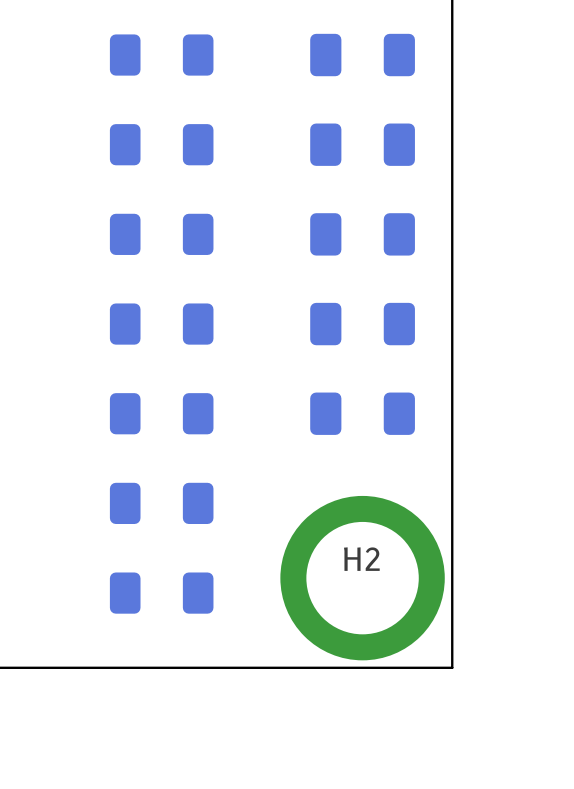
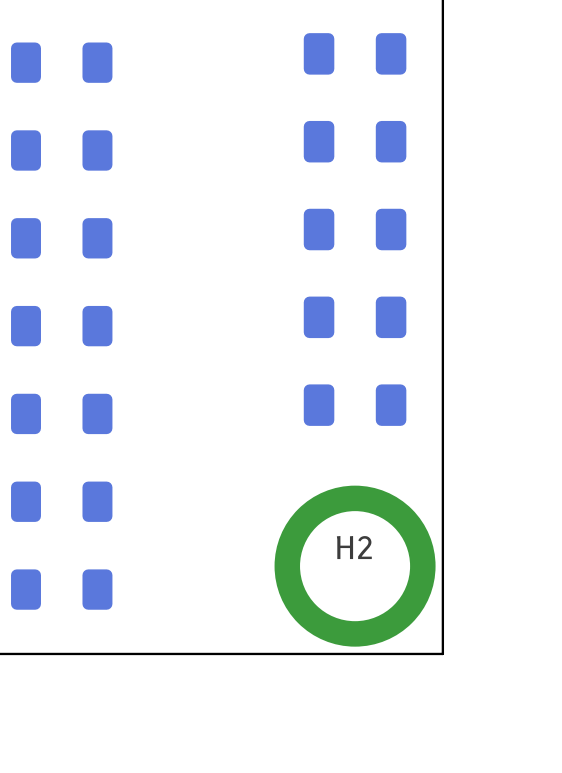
part: (161, 55) -> none
part: none -> (61, 62)
part: (161, 144) -> none
part: none -> (61, 150)
part: (161, 234) -> none
part: none -> (61, 238)
part: (161, 324) -> none
part: none -> (61, 326)
part: (161, 413) -> none
part: none -> (61, 413)
part: (161, 503) -> none
part: none -> (61, 501)
part: (161, 593) -> none
part: none -> (61, 589)

